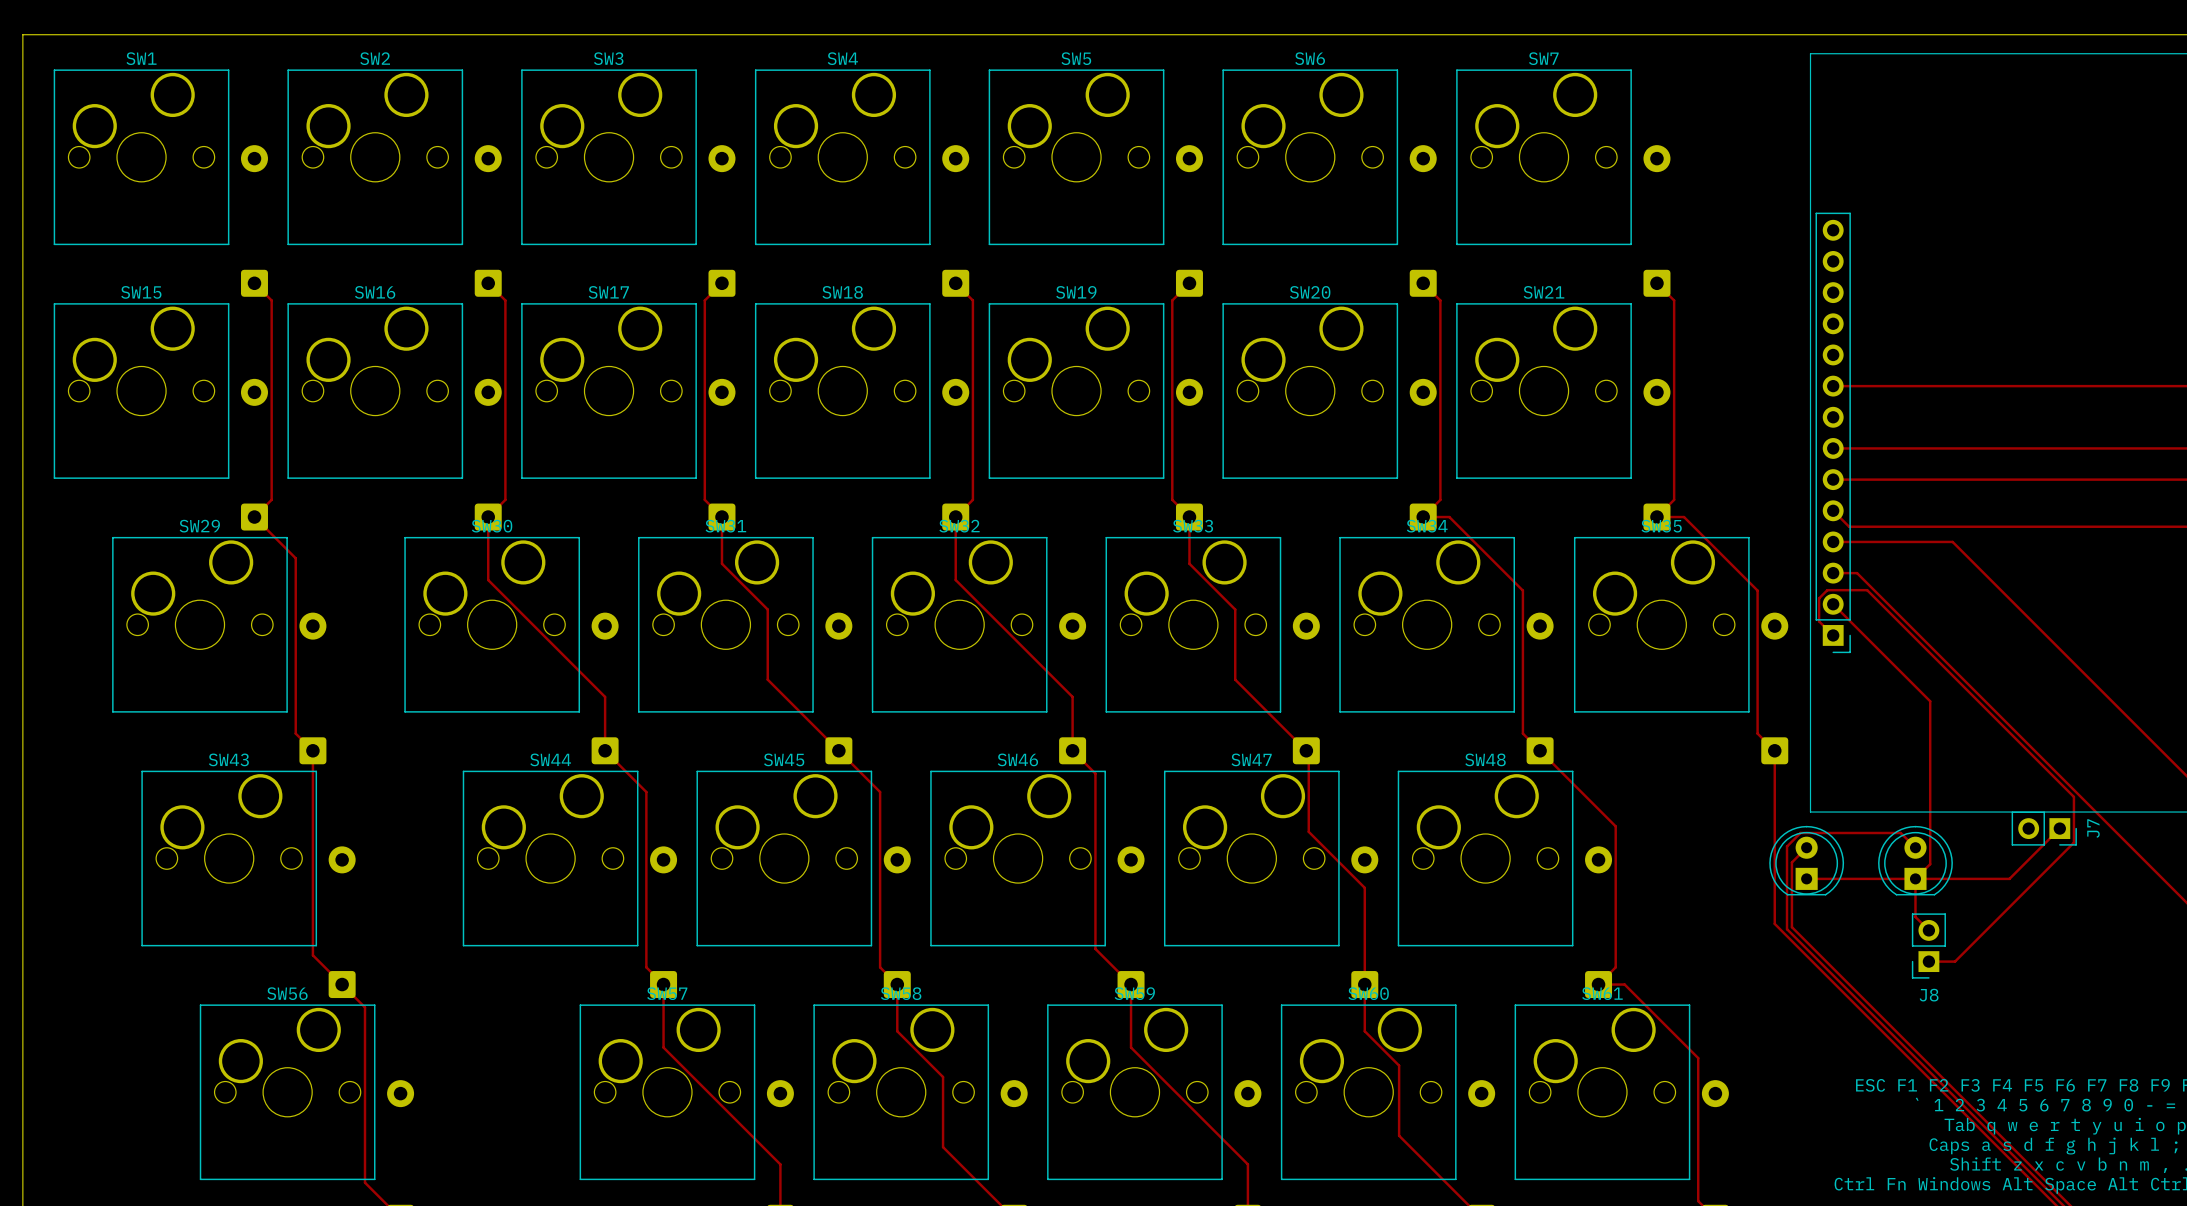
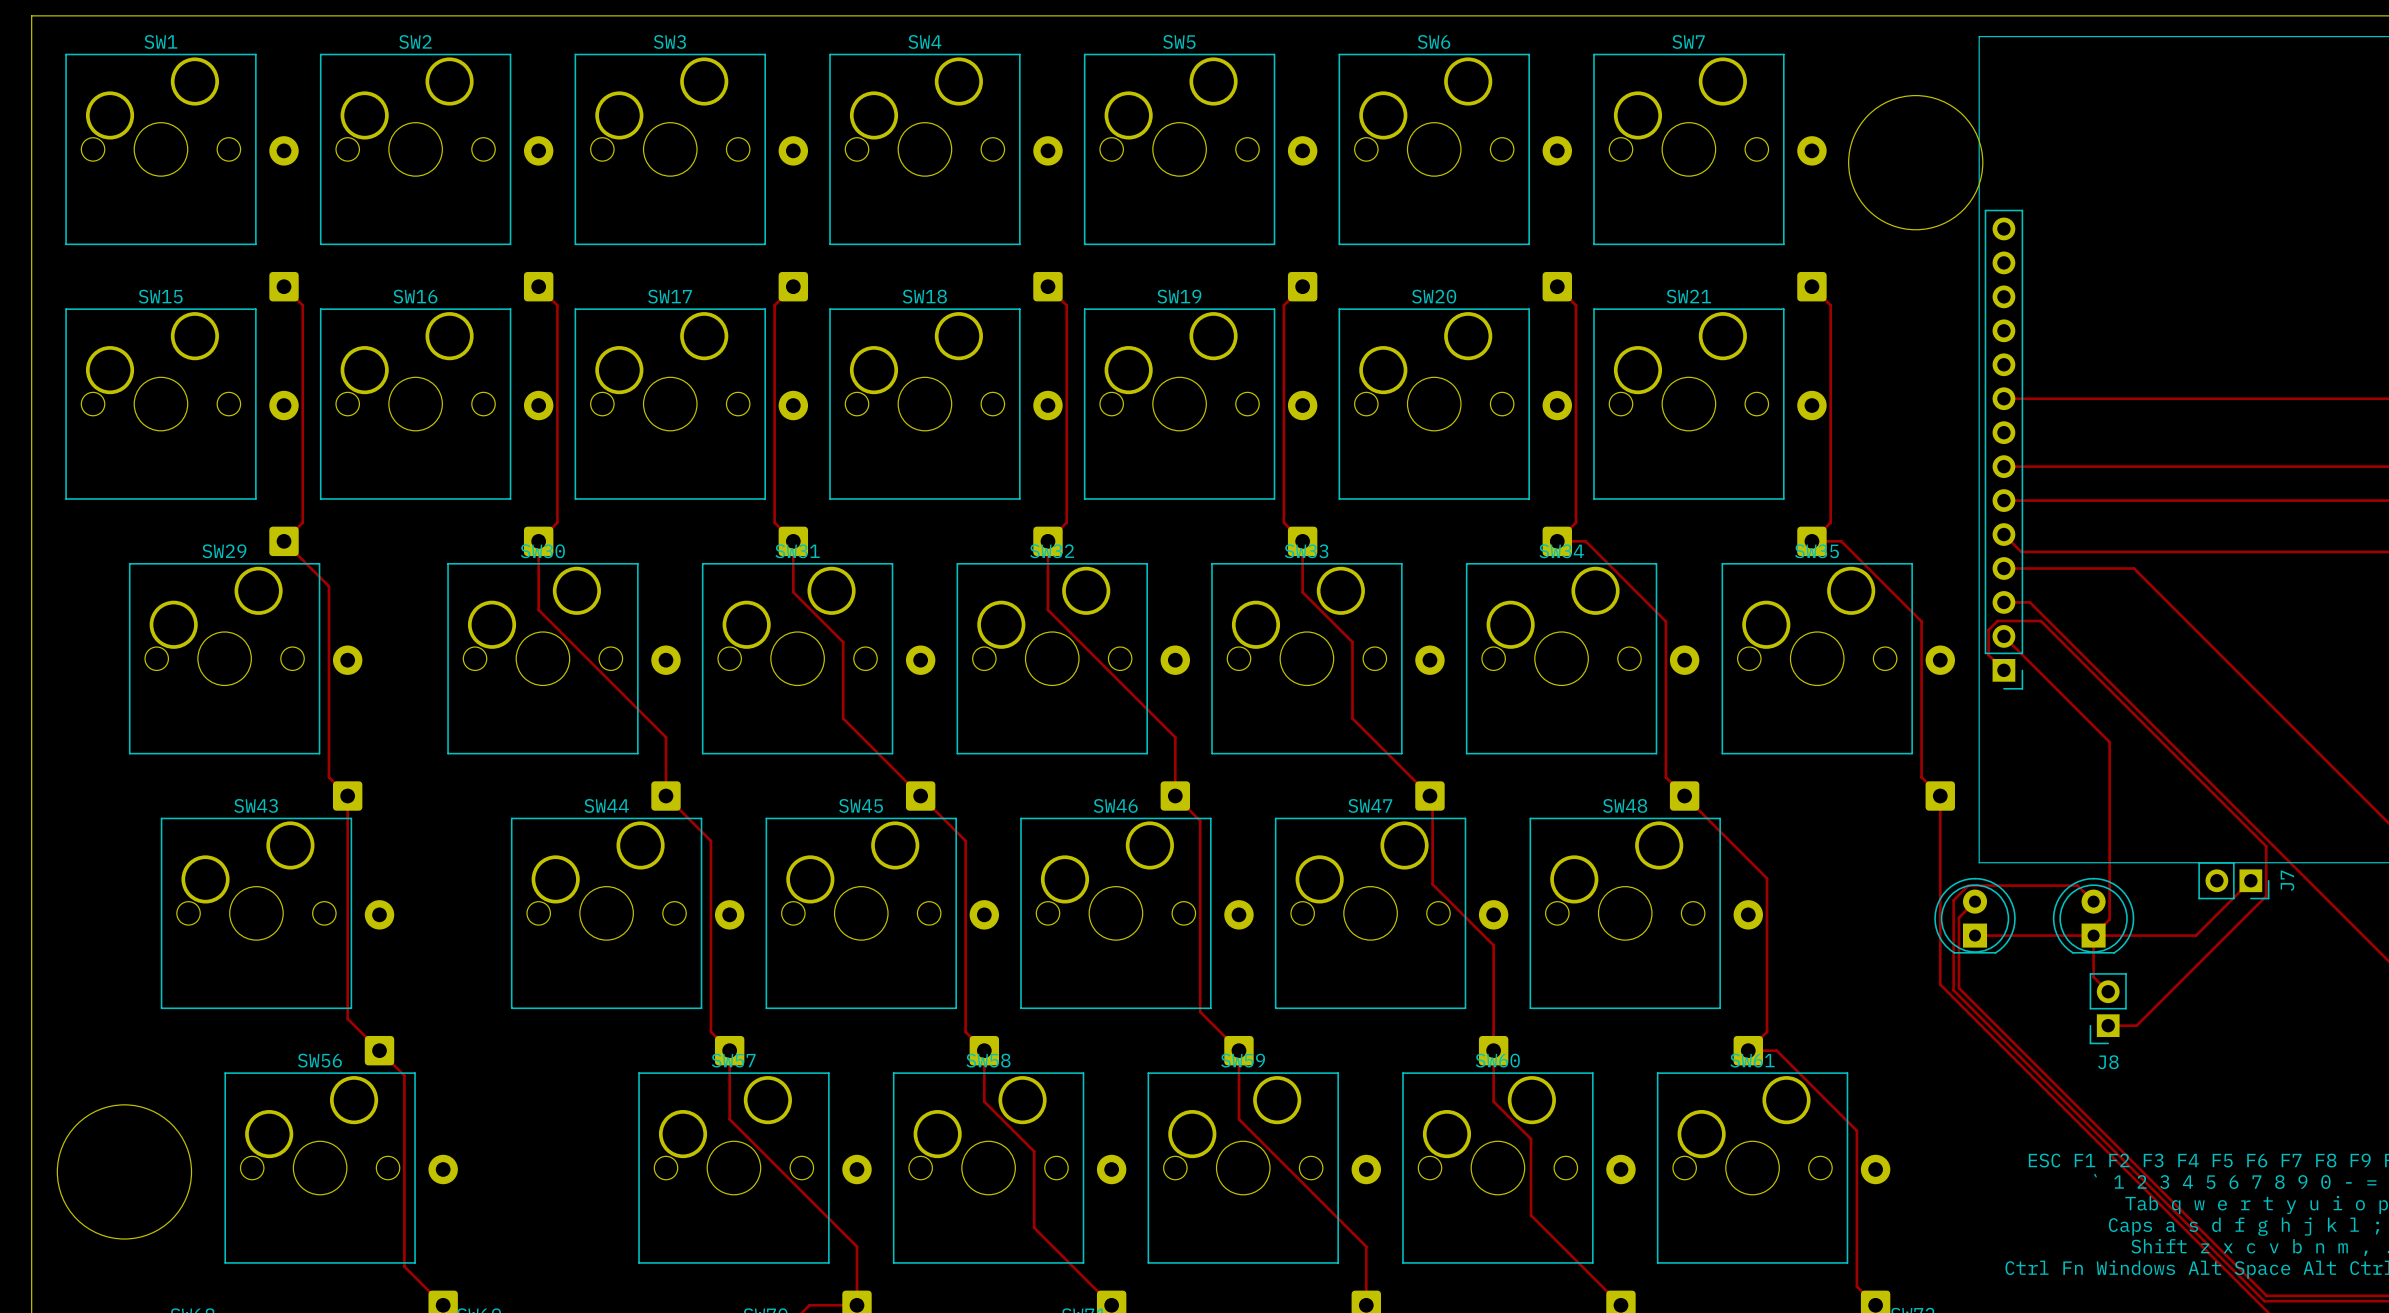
round board edge: none -> [1848, 95, 1984, 231]
round board edge: none -> [57, 1104, 192, 1240]

